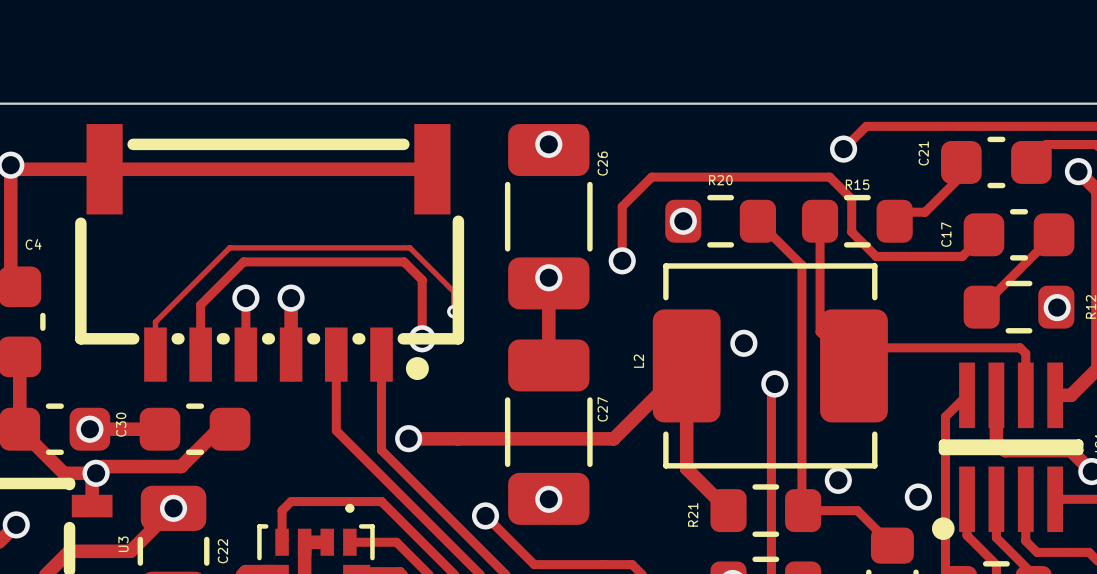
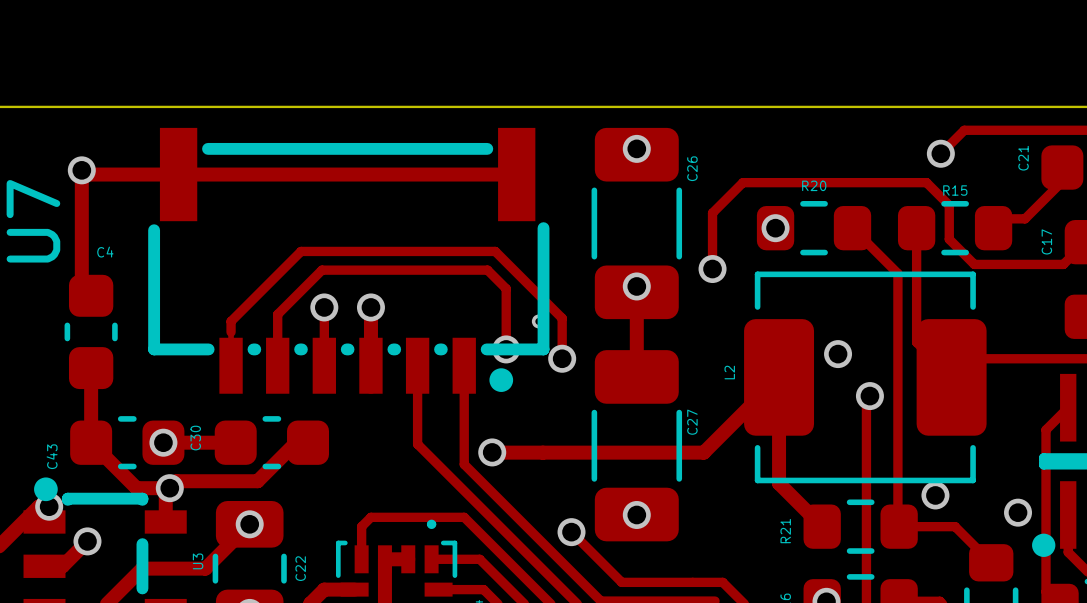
track: (453, 311) (453, 291) (409, 247) (229, 247) (155, 322) -> (562, 358) (562, 318) (495, 251) (301, 251) (231, 321) (231, 332)
via: none -> (562, 358)

